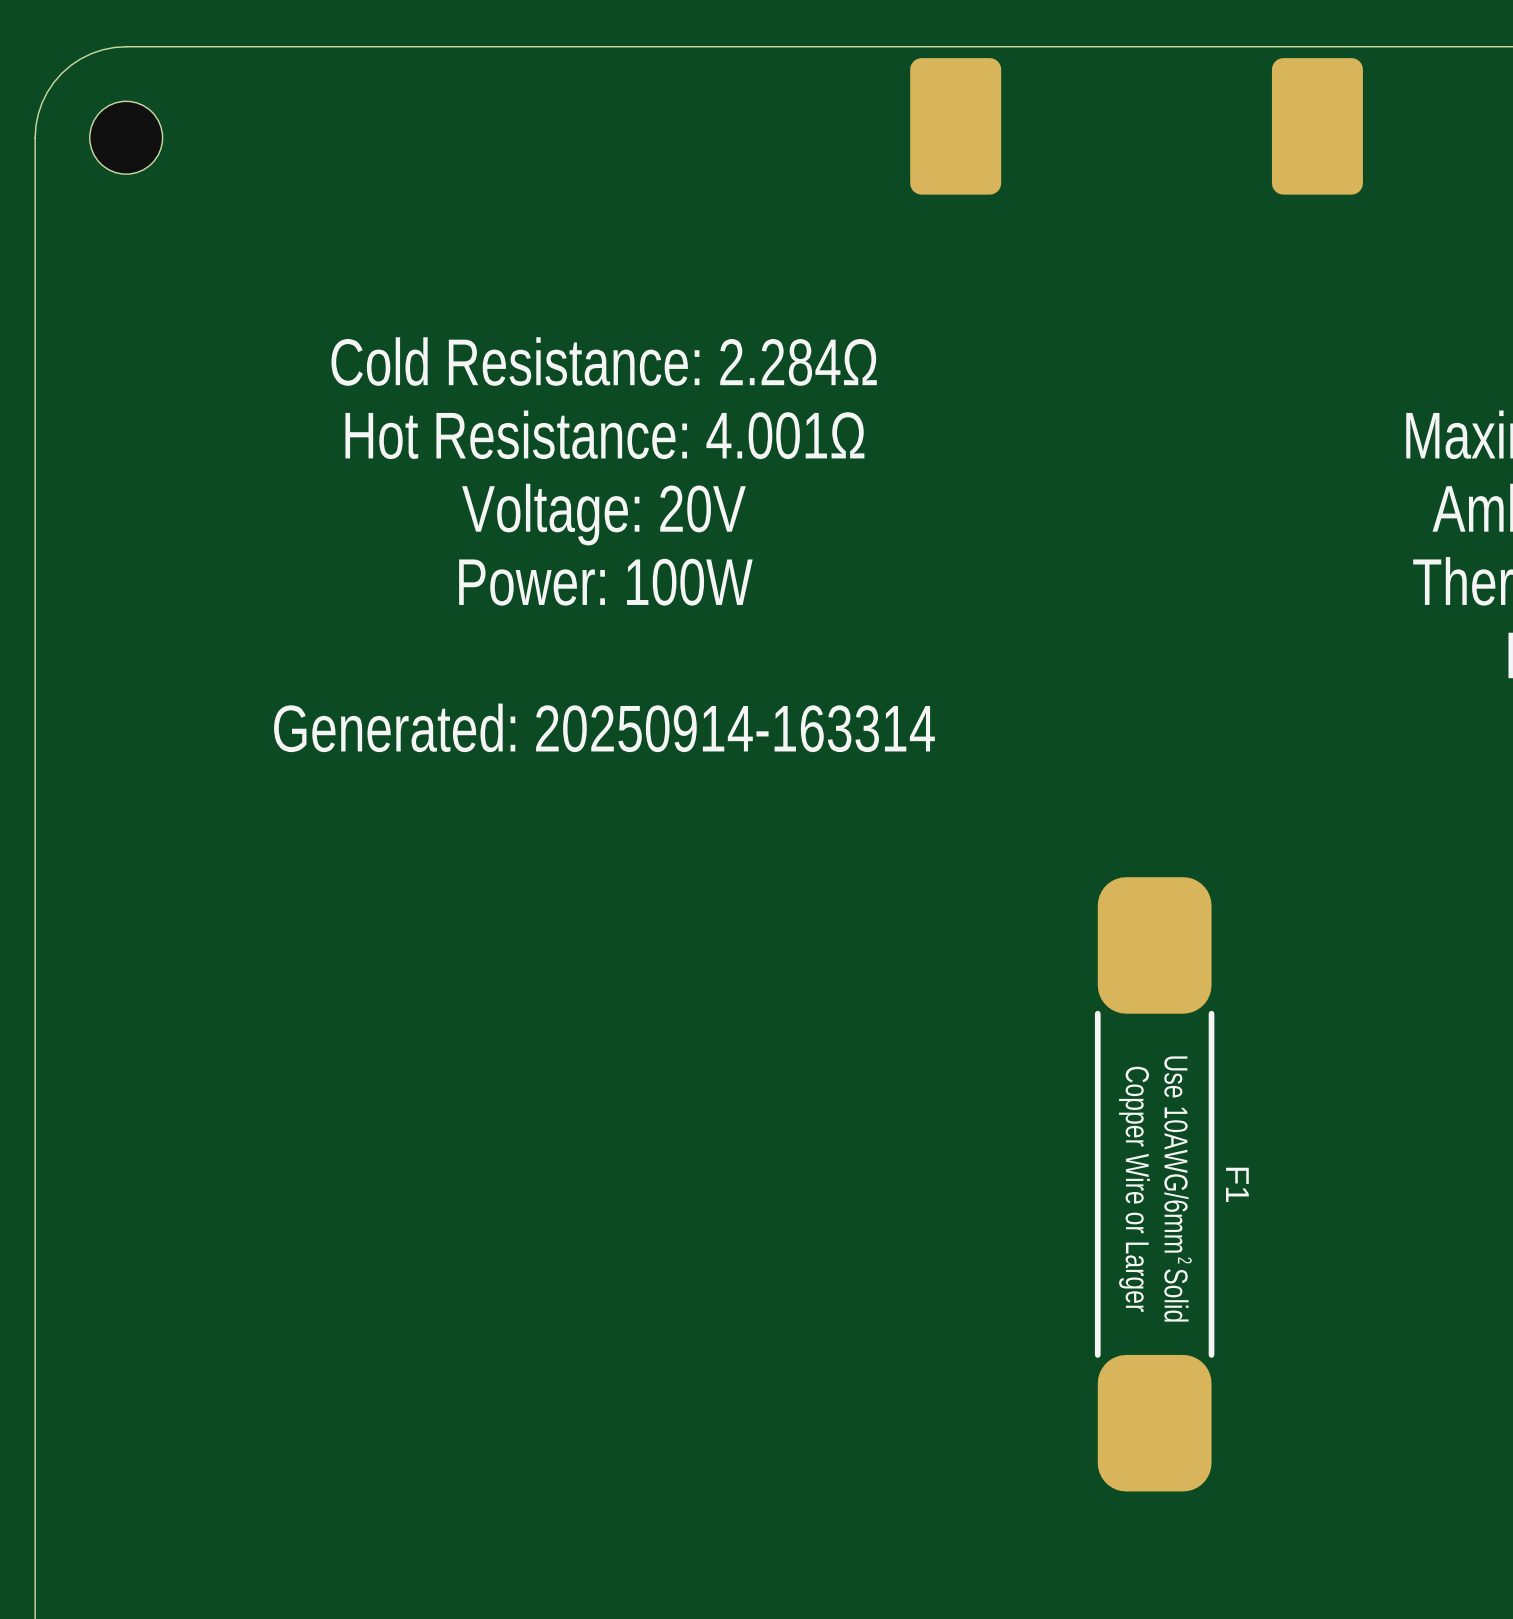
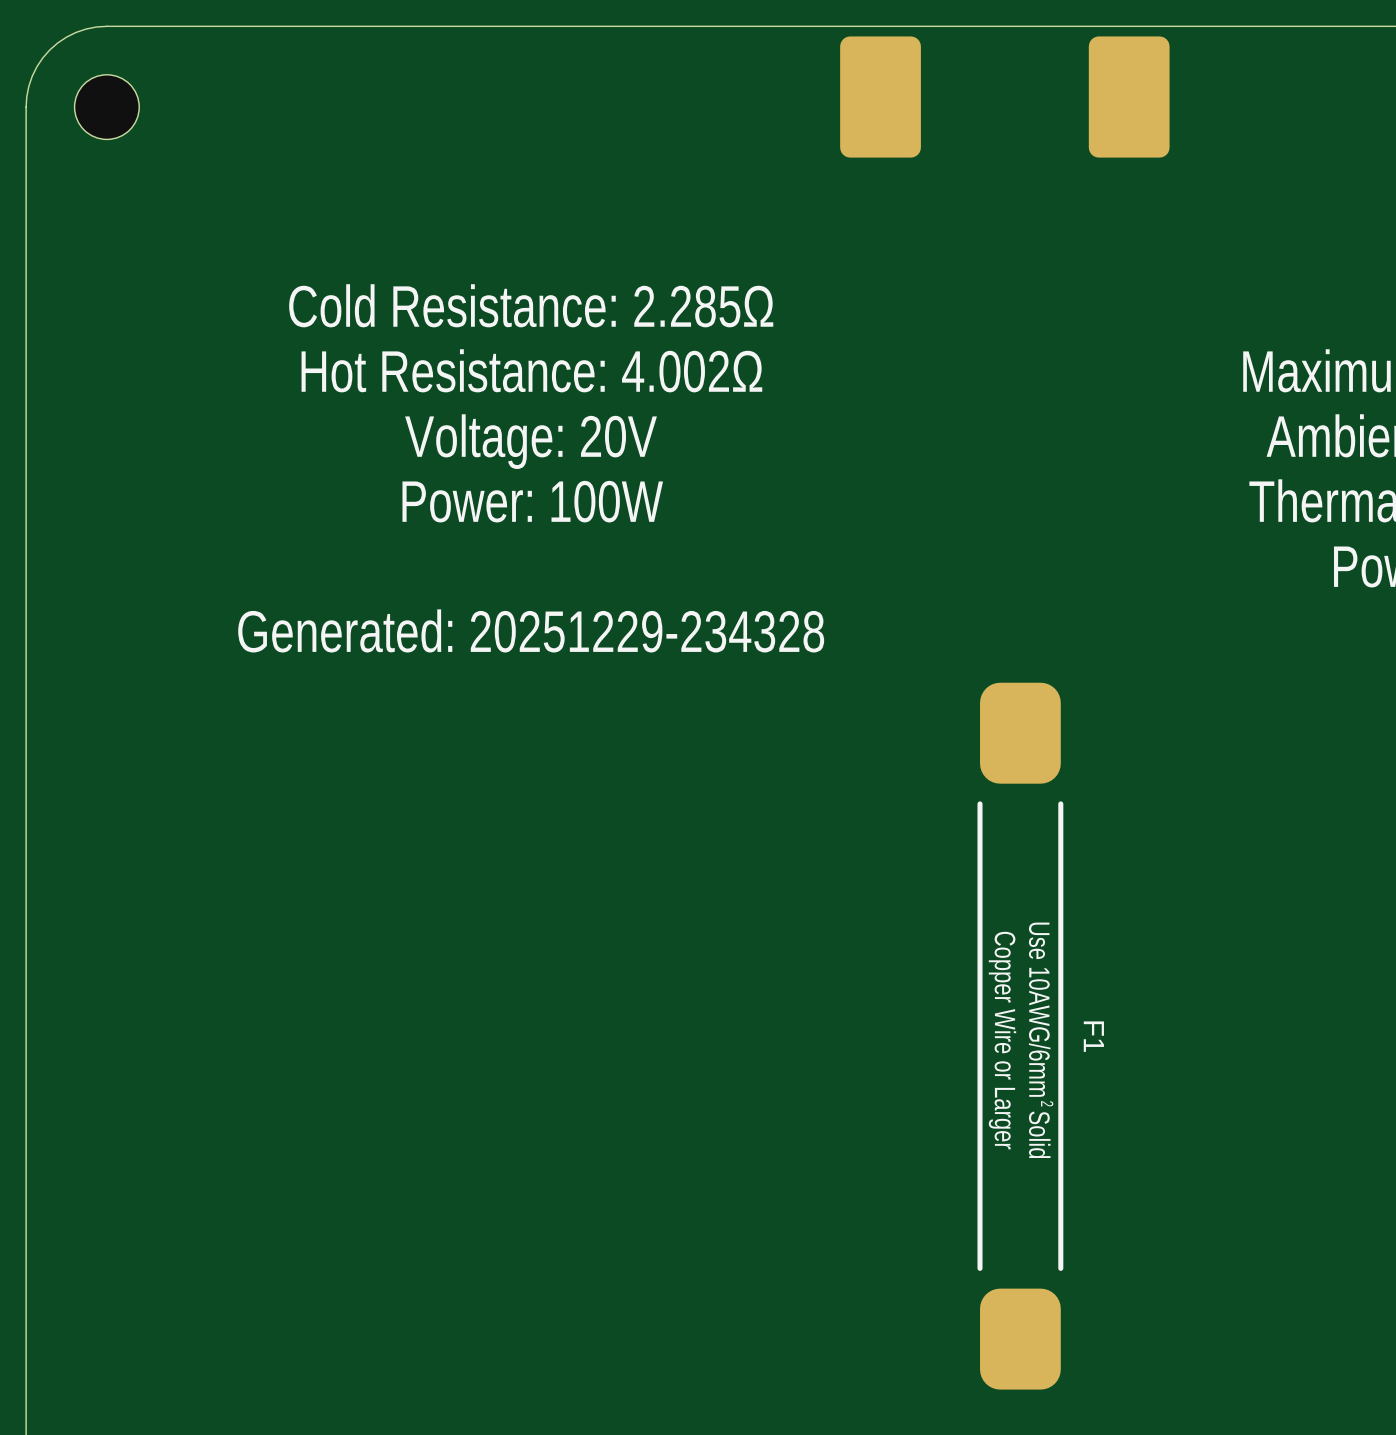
part position: (955, 126) -> (880, 97)
part position: (1317, 126) -> (1129, 97)
text: Cold Resistance: 2.284Ω (604, 361) -> Cold Resistance: 2.285Ω (531, 305)
text: Hot Resistance: 4.001Ω (604, 434) -> Hot Resistance: 4.002Ω (531, 370)
text: Generated: 20250914-163314 (604, 727) -> Generated: 20251229-234328 (531, 630)
F1 footprint: [1094, 877, 1215, 1492] -> [977, 682, 1064, 1390]

